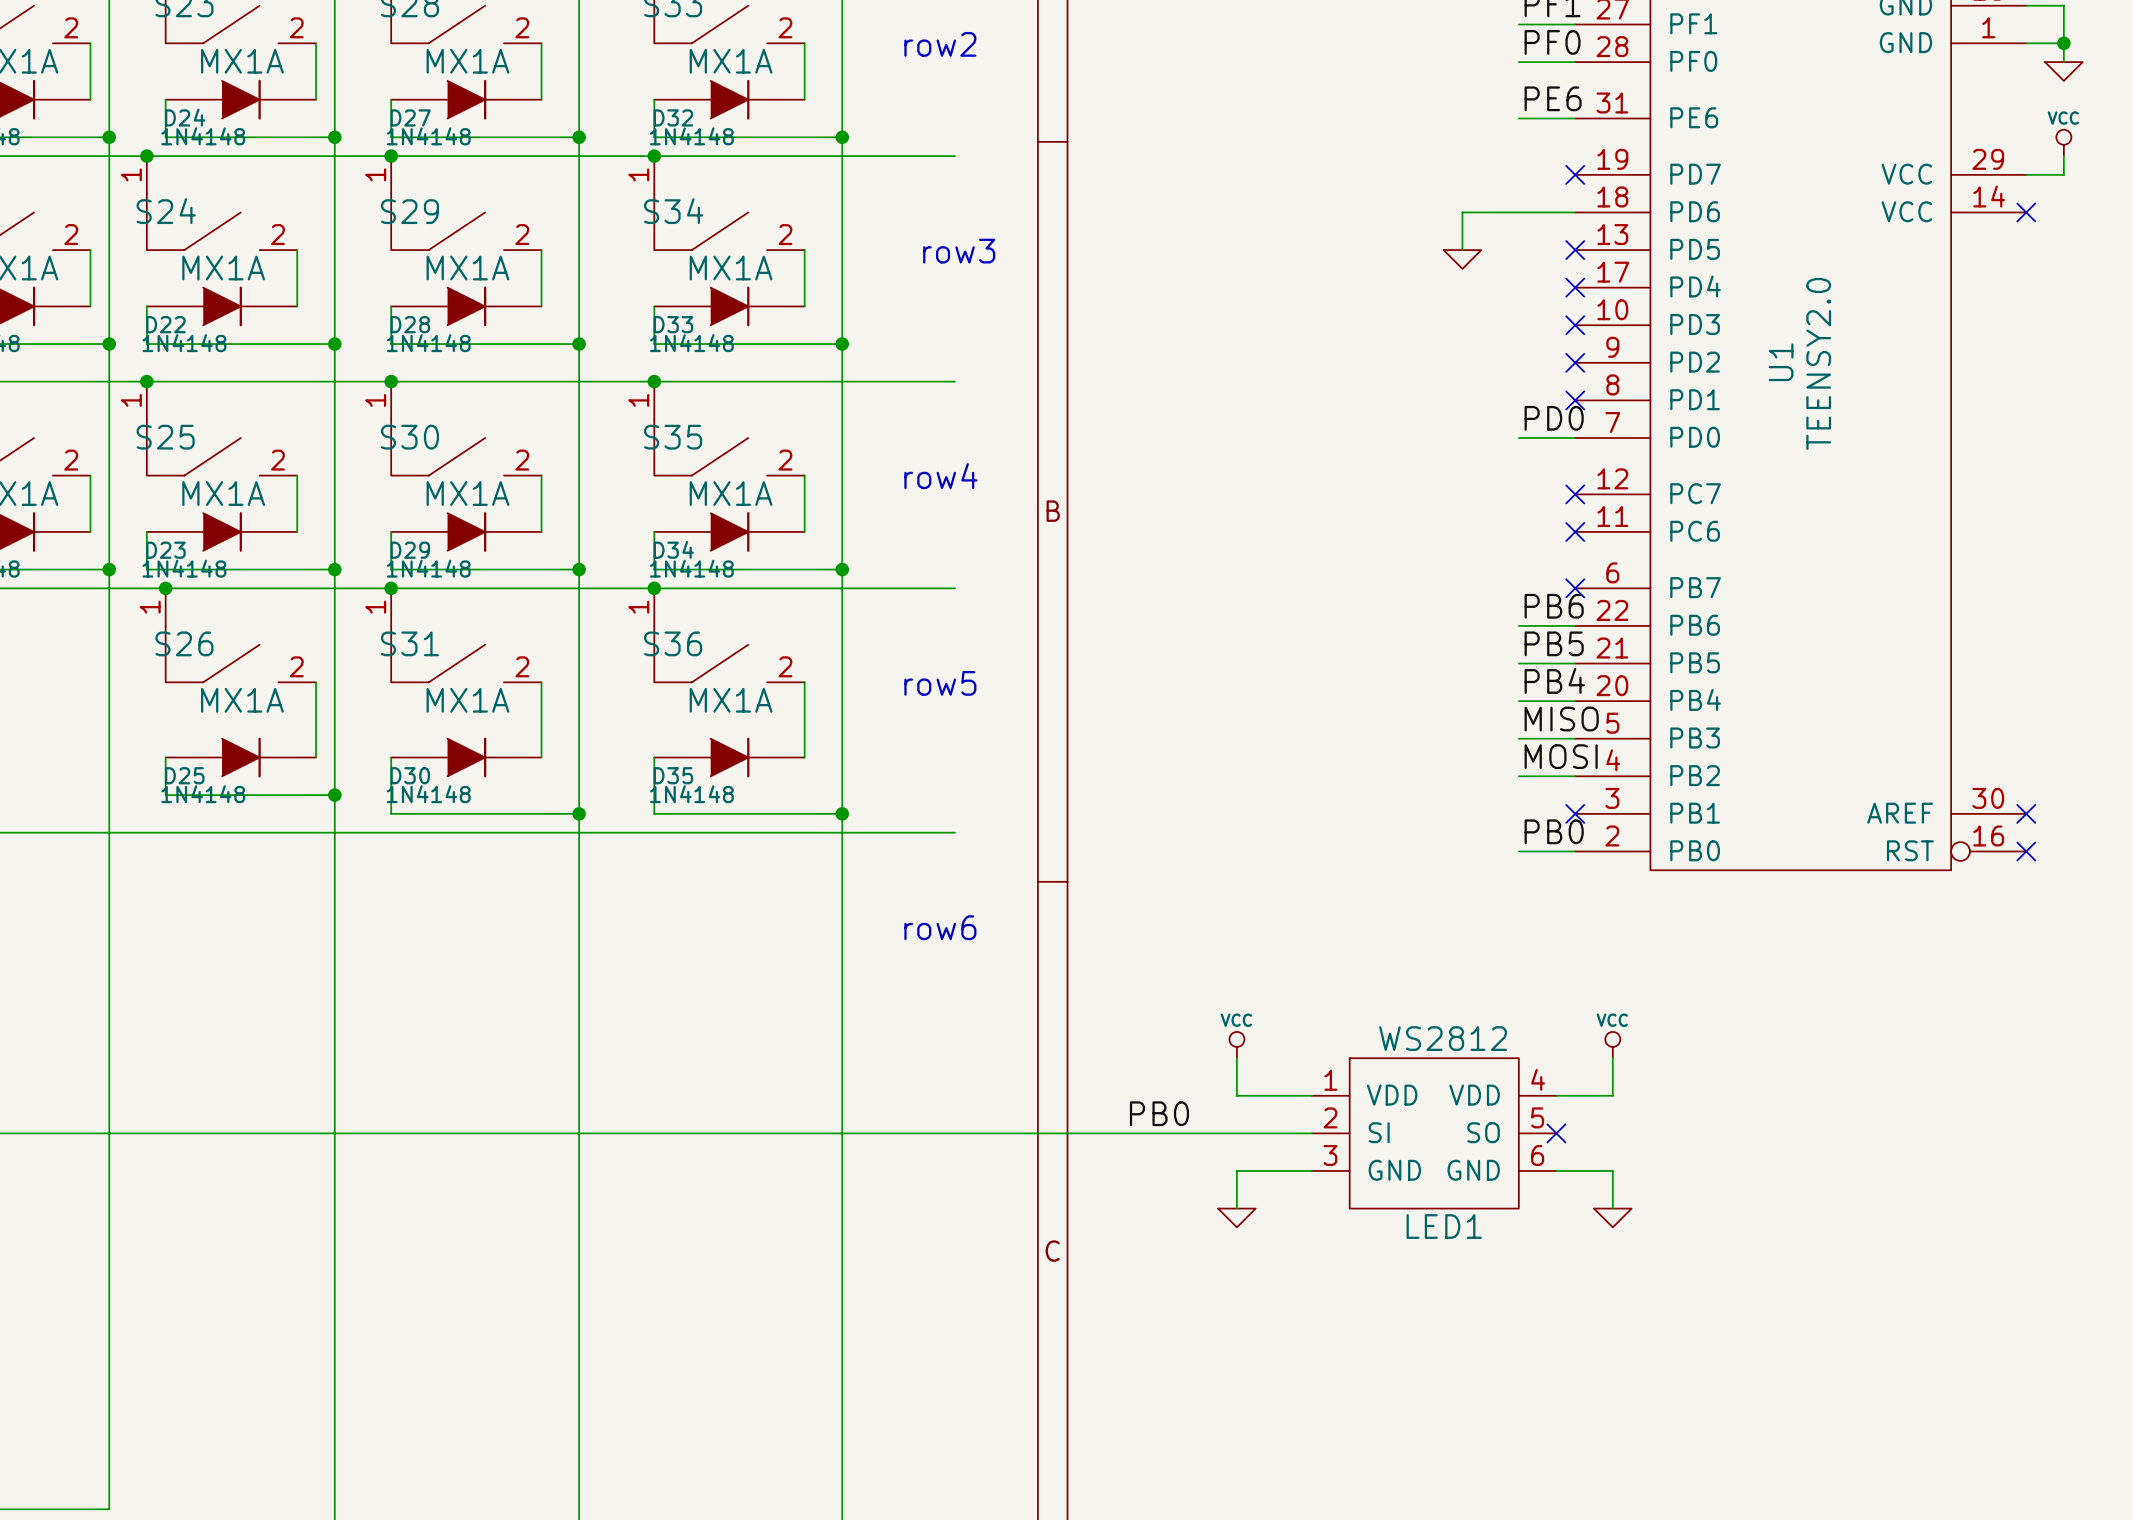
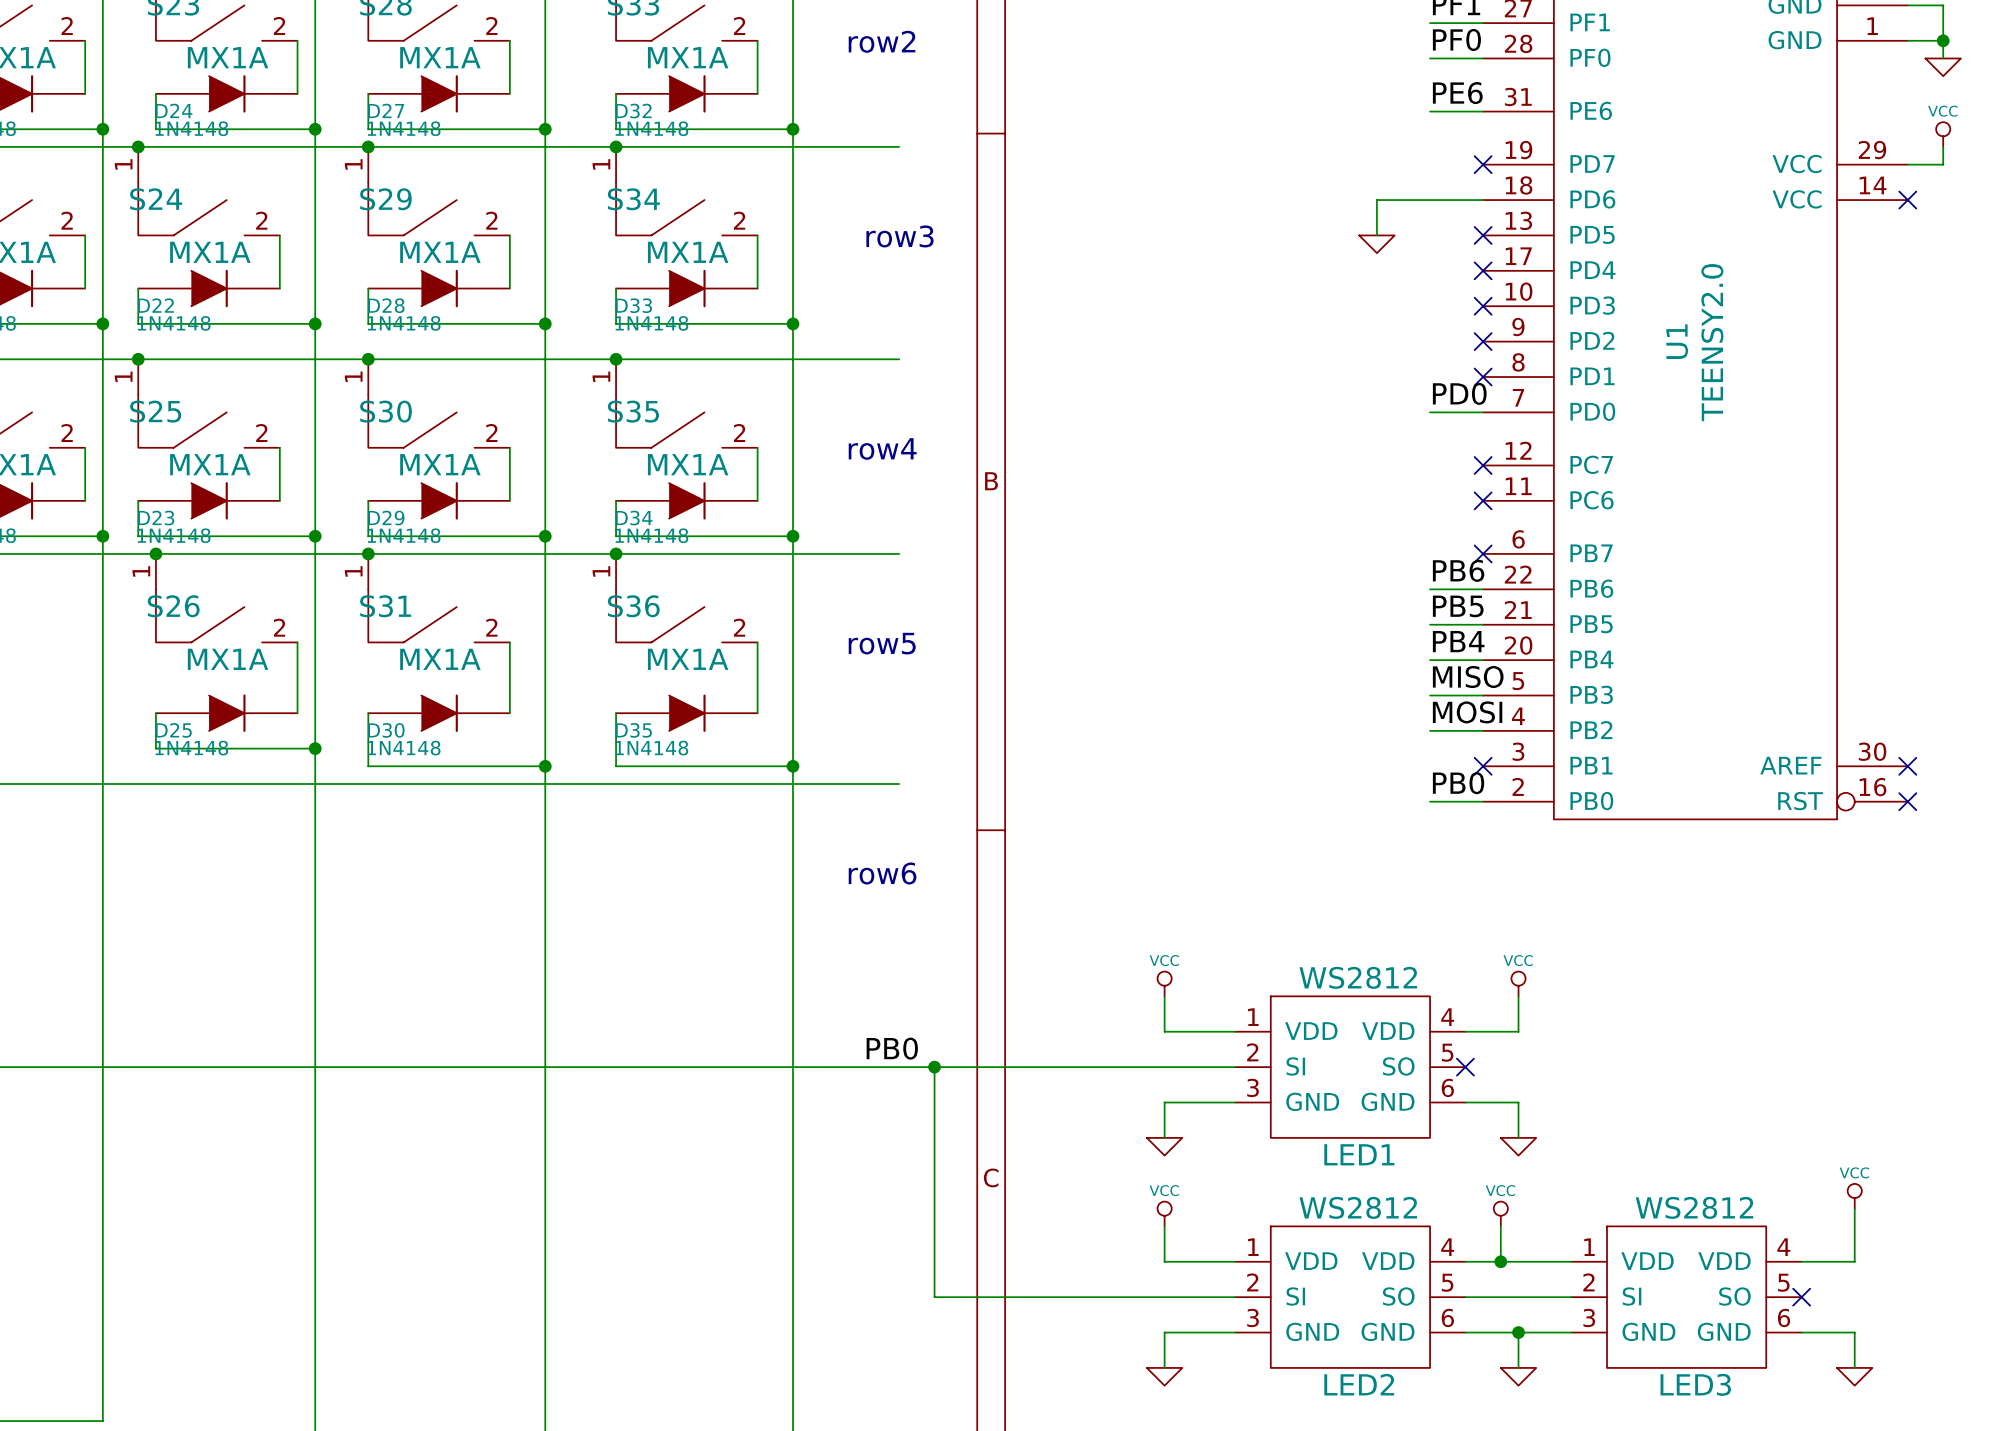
label position: PB0 (1159, 1113) -> PB0 (892, 1048)
wire: none -> (934, 1067) (934, 1297) (1235, 1297)
junction: none -> (934, 1067)
power symbol: none -> VCC (1854, 1196)
wire: none -> (1854, 1208) (1854, 1261) (1801, 1261)
power symbol: none -> VCC (1164, 1213)
power symbol: none -> VCC (1500, 1213)
wire: none -> (1164, 1226) (1164, 1261) (1235, 1261)
wire: none -> (1500, 1226) (1500, 1261)
wire: none -> (1465, 1261) (1571, 1261)
junction: none -> (1500, 1261)
LED2: none -> WS2812 (1412, 1288)
LED3: none -> WS2812 (1748, 1288)
wire: none -> (1465, 1297) (1571, 1297)
no-connect mark: none -> (1801, 1297)
wire: none -> (1235, 1332) (1164, 1332) (1164, 1367)
wire: none -> (1465, 1332) (1571, 1332)
wire: none -> (1518, 1332) (1518, 1367)
junction: none -> (1518, 1332)
wire: none -> (1801, 1332) (1854, 1332) (1854, 1367)
power symbol: none -> (1164, 1376)
power symbol: none -> (1518, 1376)
power symbol: none -> (1854, 1376)

